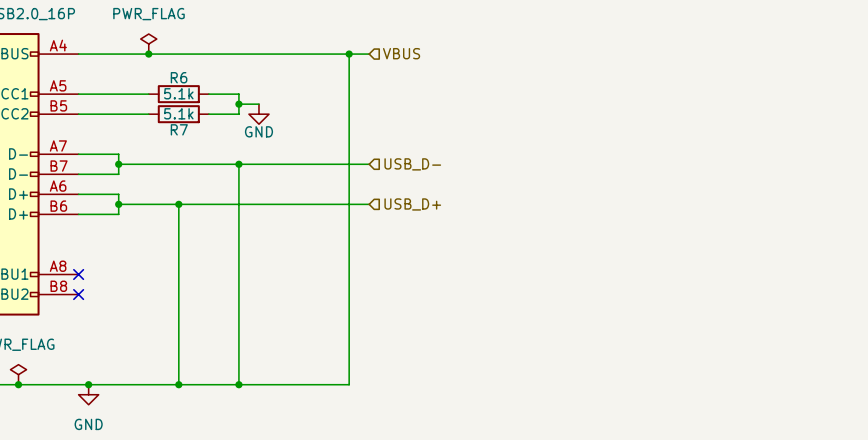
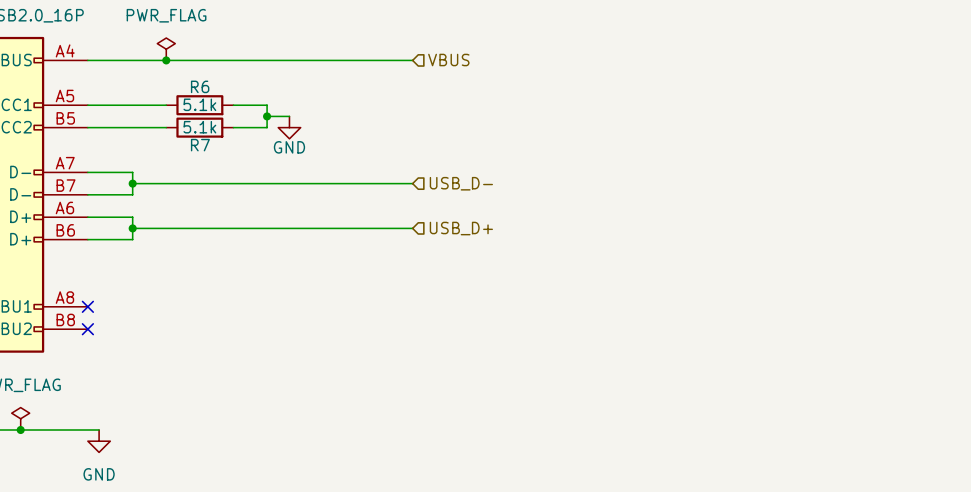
wire: (349, 54) (349, 384) (88, 384) -> none
junction: (349, 54) -> none
wire: (238, 164) (238, 384) -> none
junction: (238, 164) -> none
wire: (178, 204) (178, 384) -> none
junction: (178, 204) -> none
junction: (88, 384) -> none
junction: (178, 384) -> none
junction: (238, 384) -> none

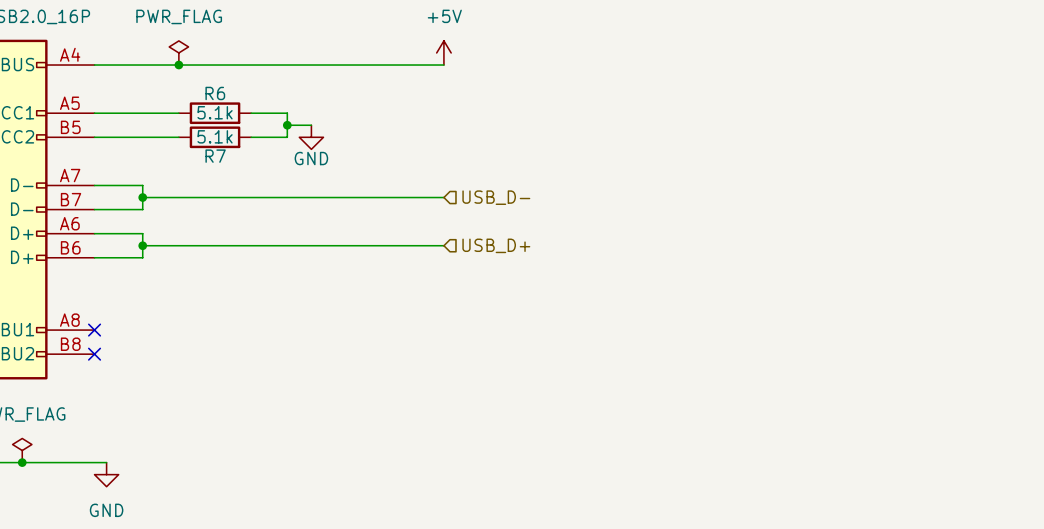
power symbol: none -> +5V (443, 52)
hierarchical label: VBUS (448, 60) -> none

